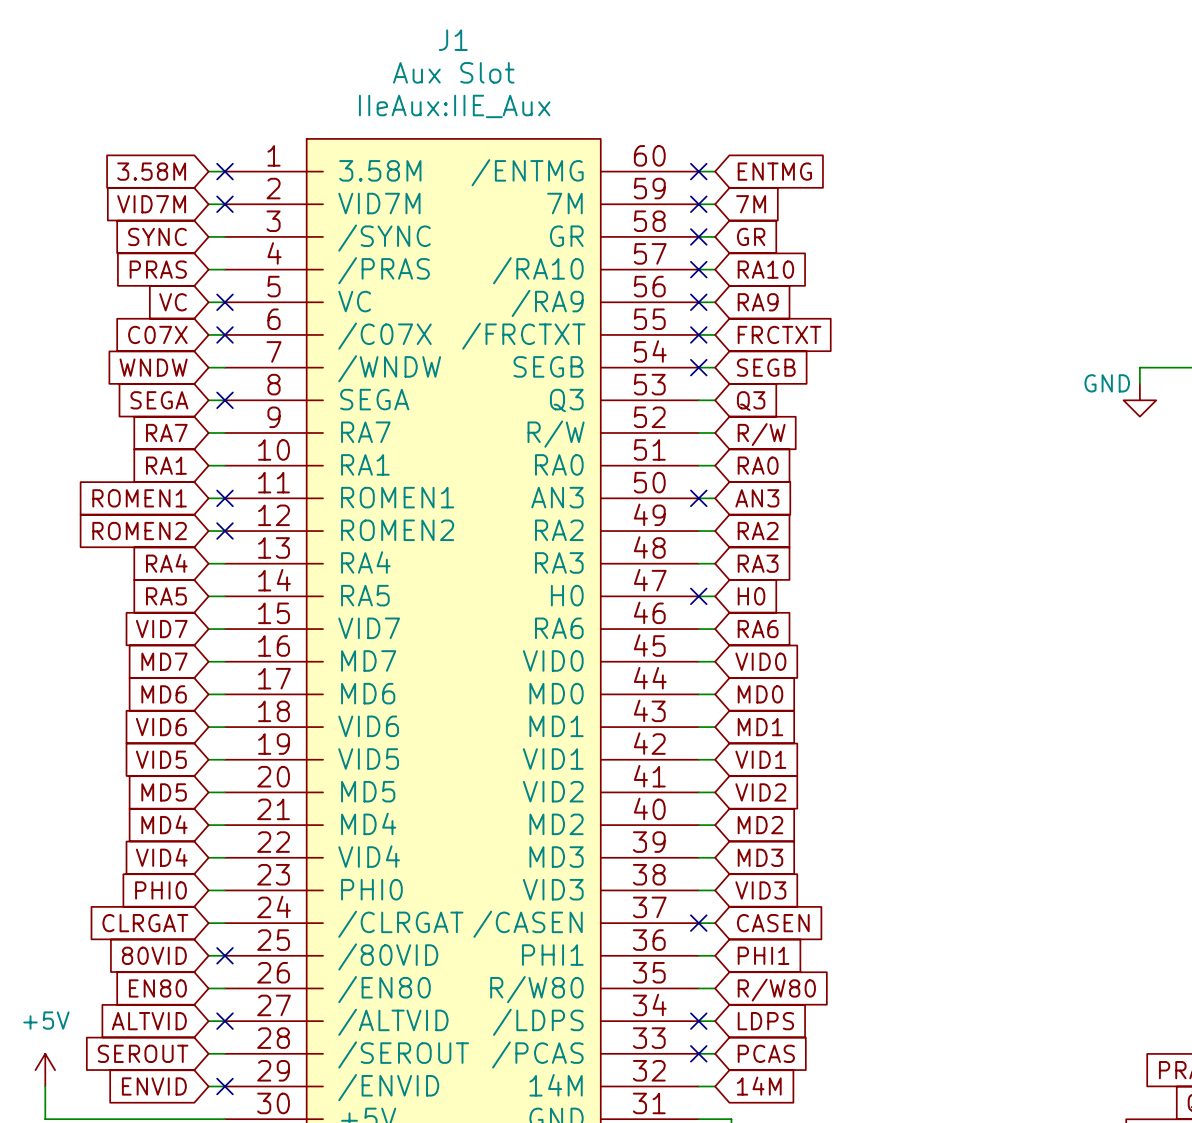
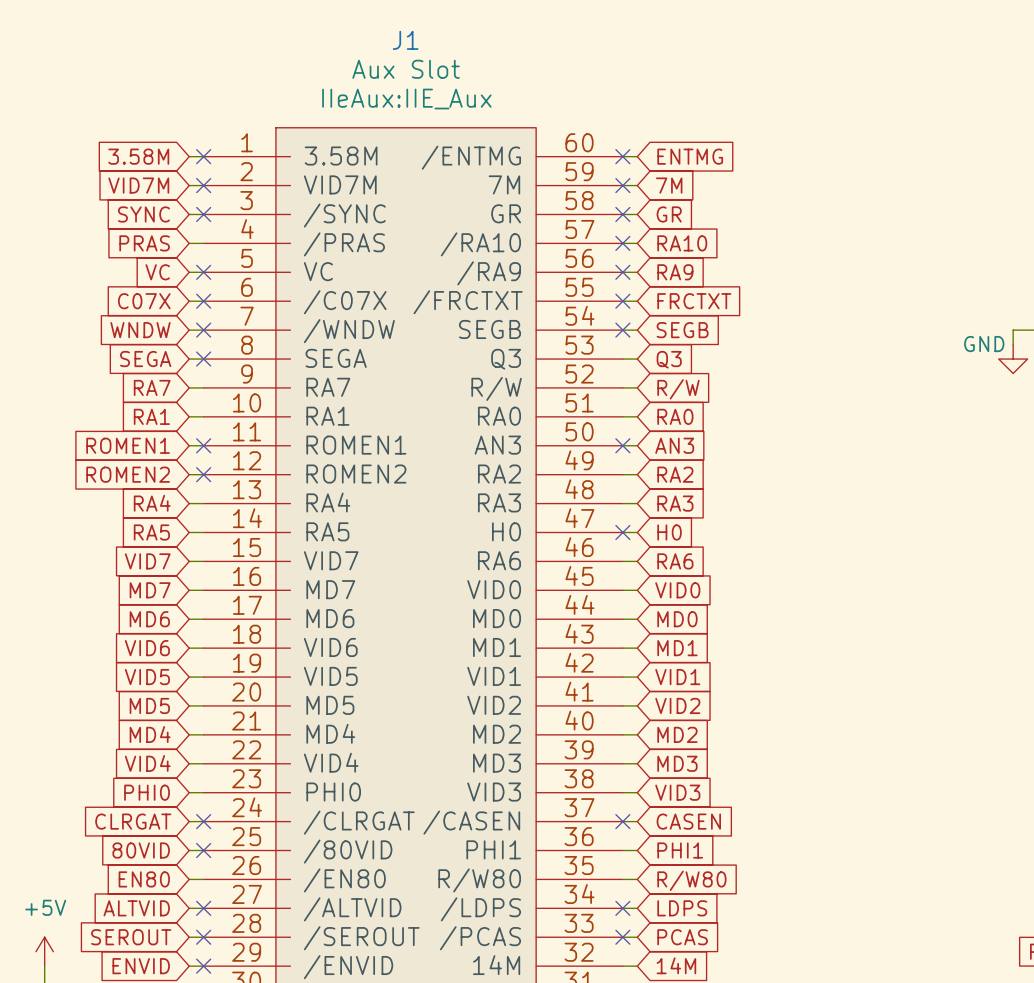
no-connect mark: none -> (203, 214)
no-connect mark: none -> (203, 330)
no-connect mark: none -> (203, 821)
no-connect mark: none -> (203, 937)

